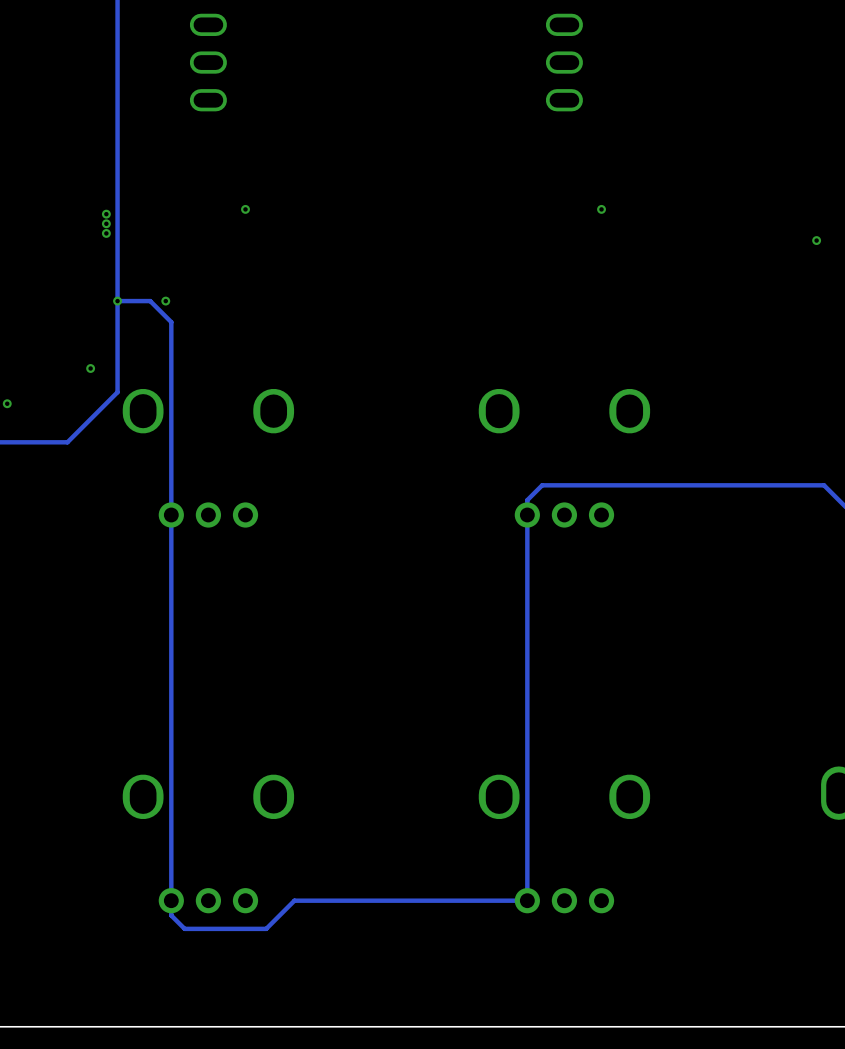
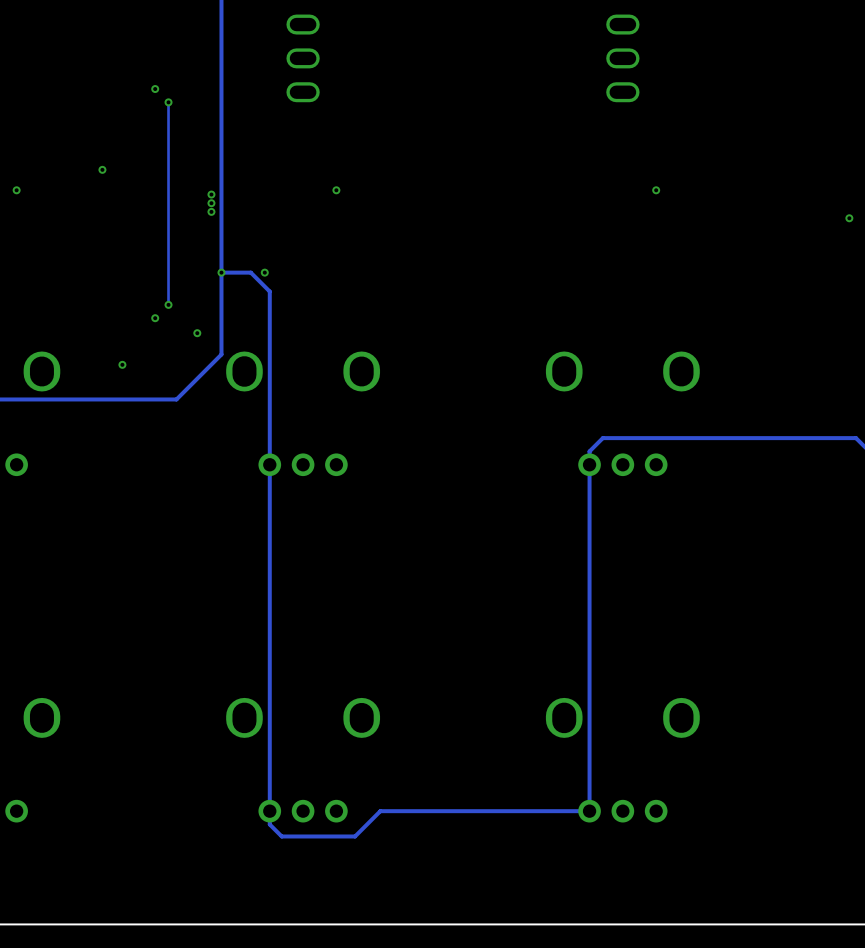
via: none -> (155, 89)
track: none -> (168, 102) (168, 304)
via: none -> (168, 102)
via: none -> (168, 304)
via: none -> (155, 318)

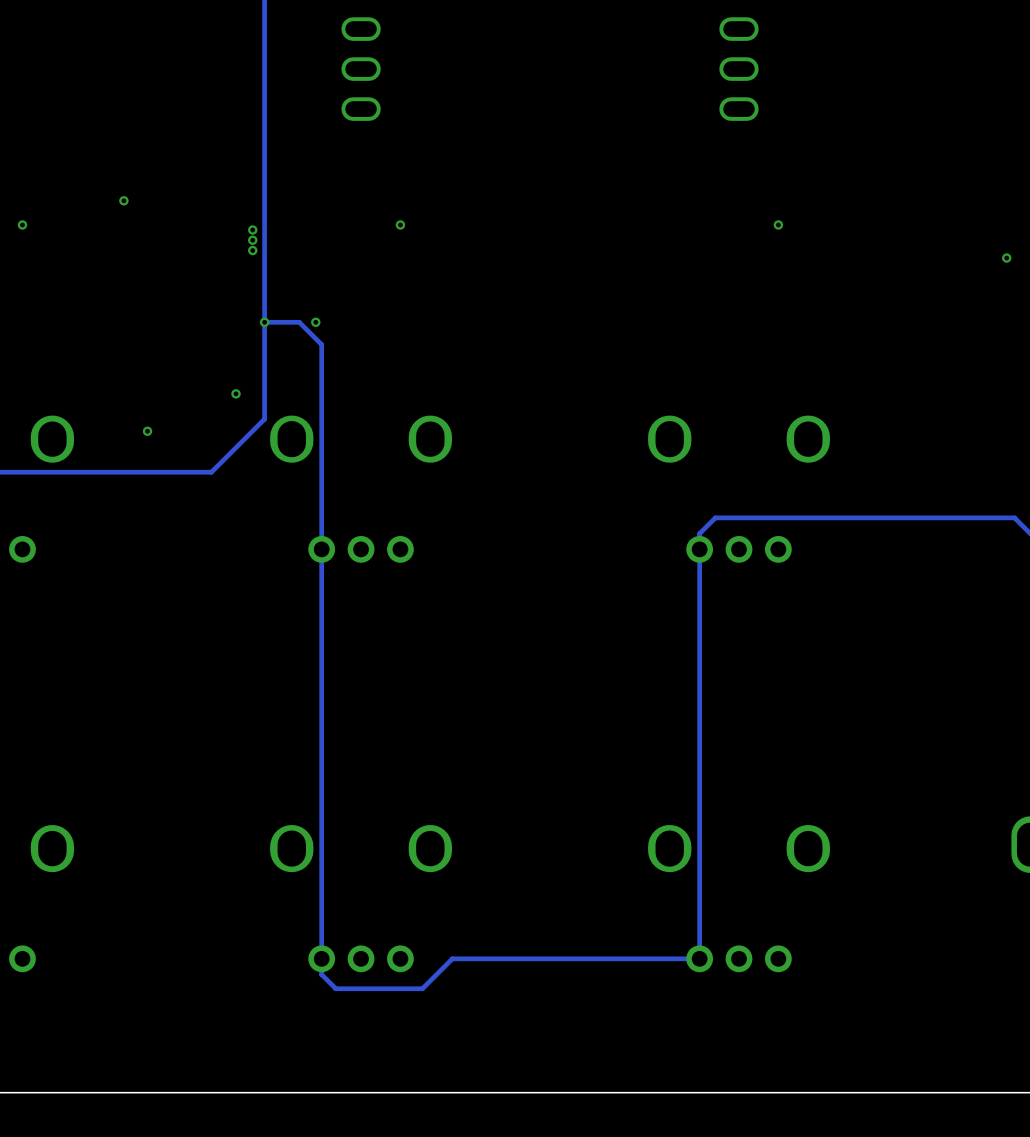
via: (155, 89) -> none
track: (168, 102) (168, 304) -> none
via: (168, 102) -> none
via: (168, 304) -> none
via: (155, 318) -> none

